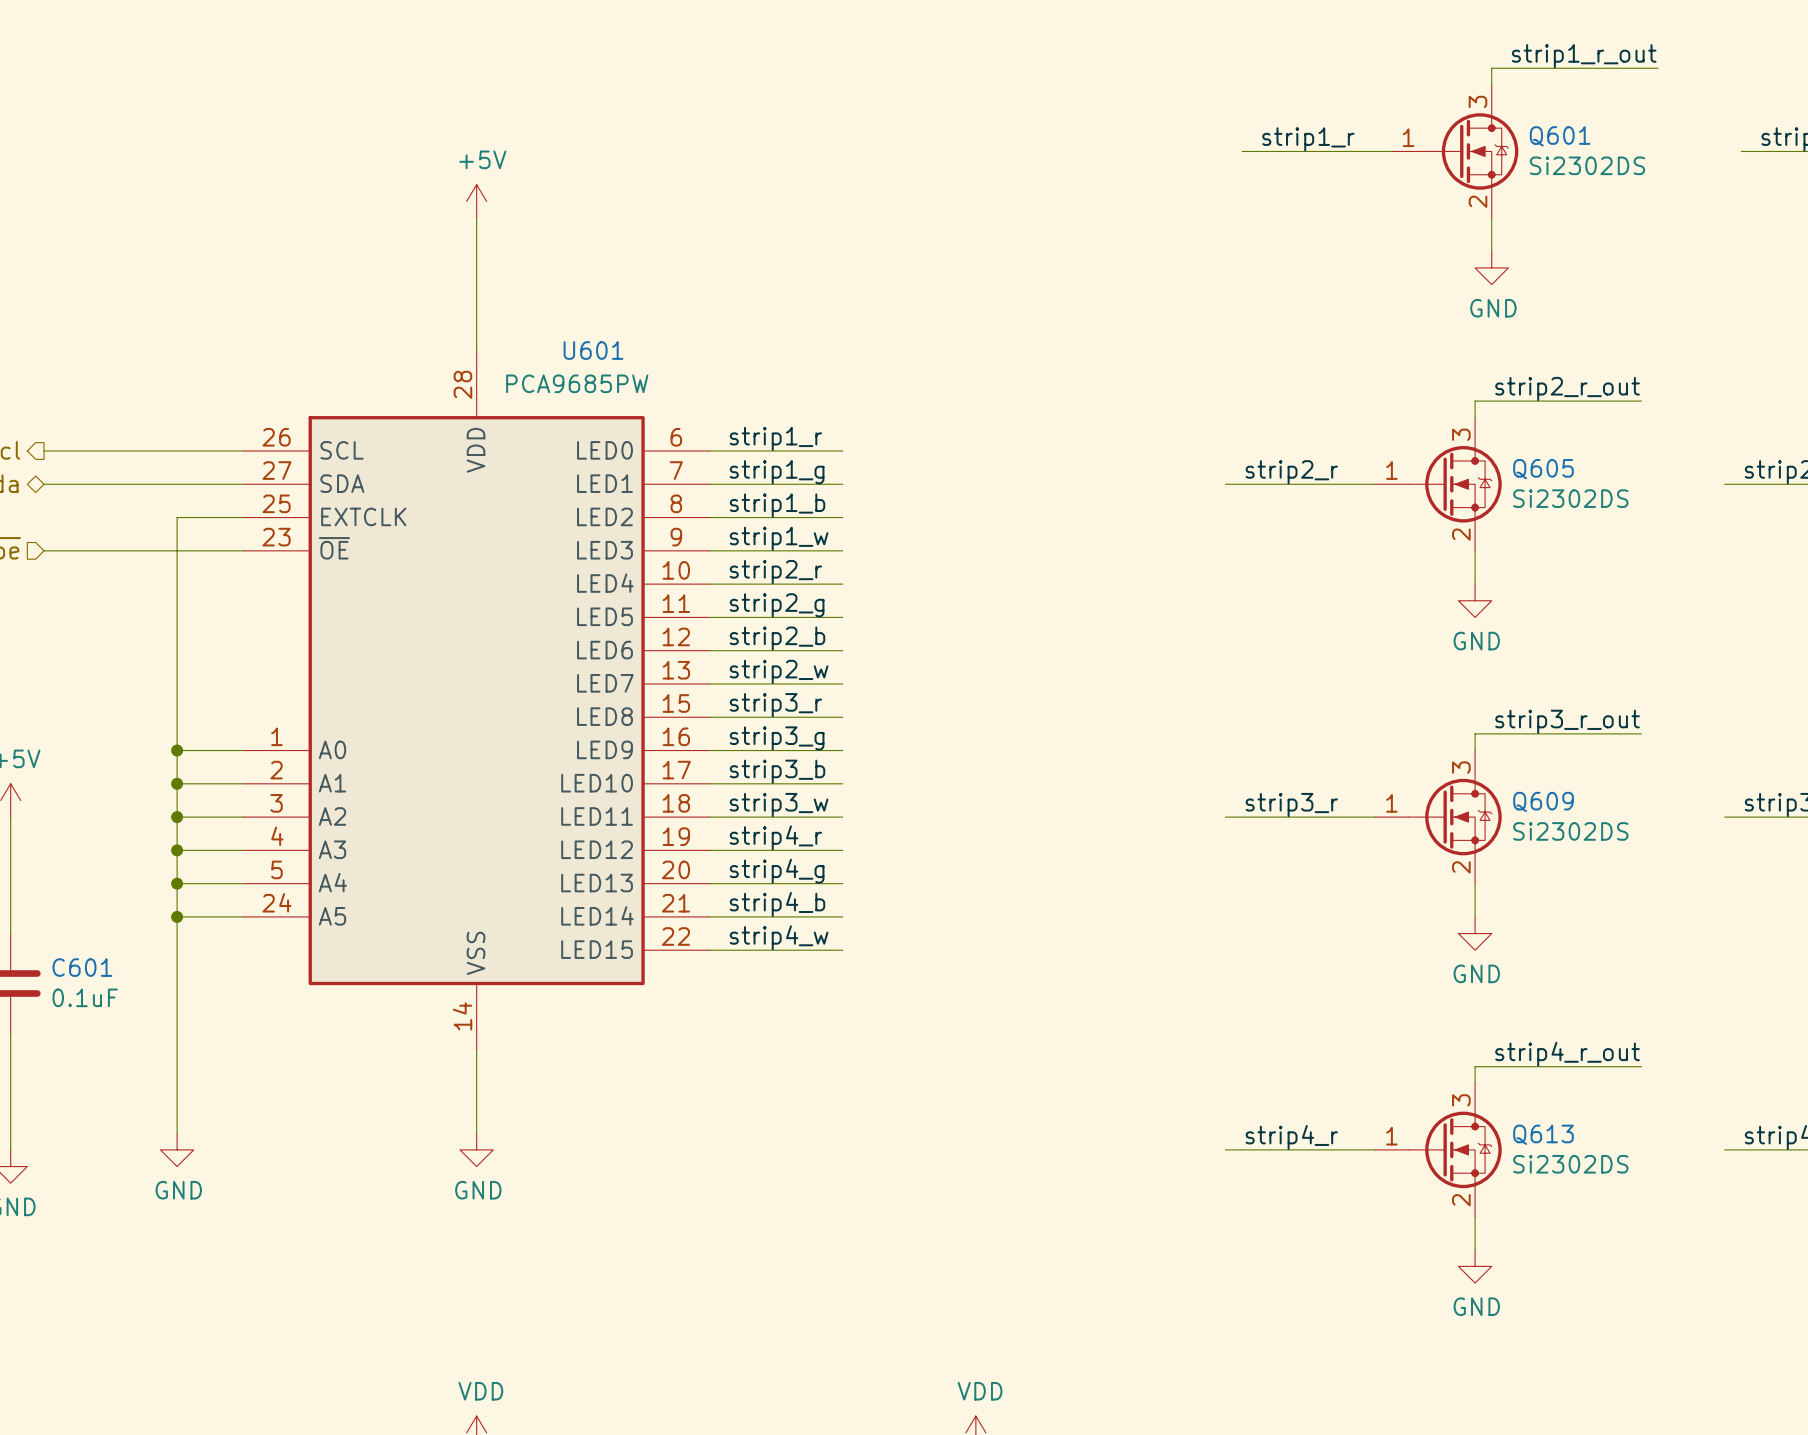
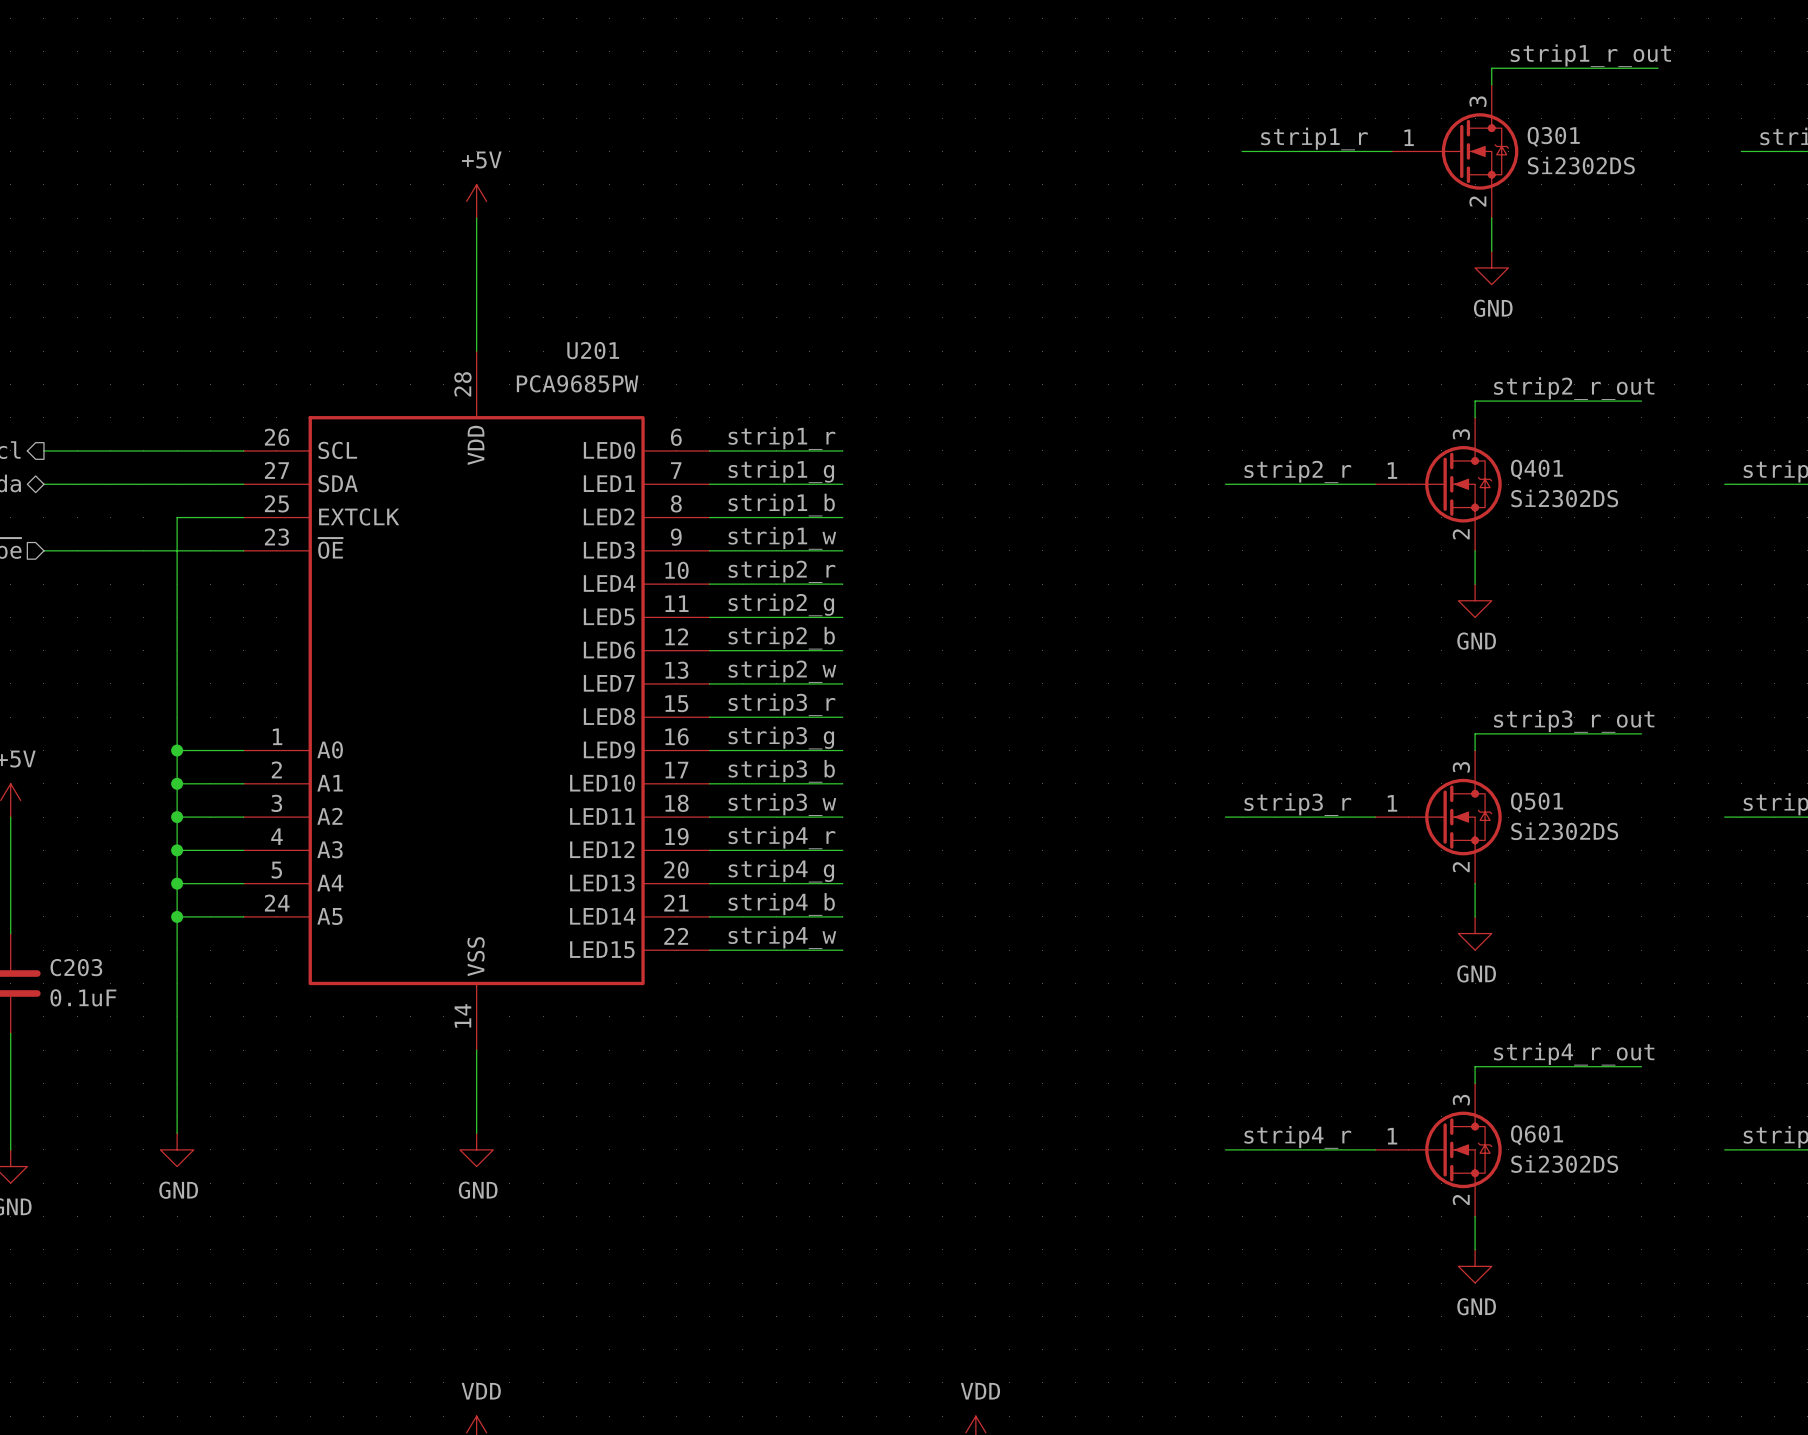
Q601 name: Q601 (1560, 136) -> Q301 (1553, 136)
U601 name: U601 (593, 350) -> U201 (593, 350)
Q605 name: Q605 (1543, 469) -> Q401 (1537, 469)
Q609 name: Q609 (1543, 801) -> Q501 (1537, 802)
C601 name: C601 (82, 967) -> C203 (76, 967)
Q613 name: Q613 (1543, 1134) -> Q601 (1537, 1135)

